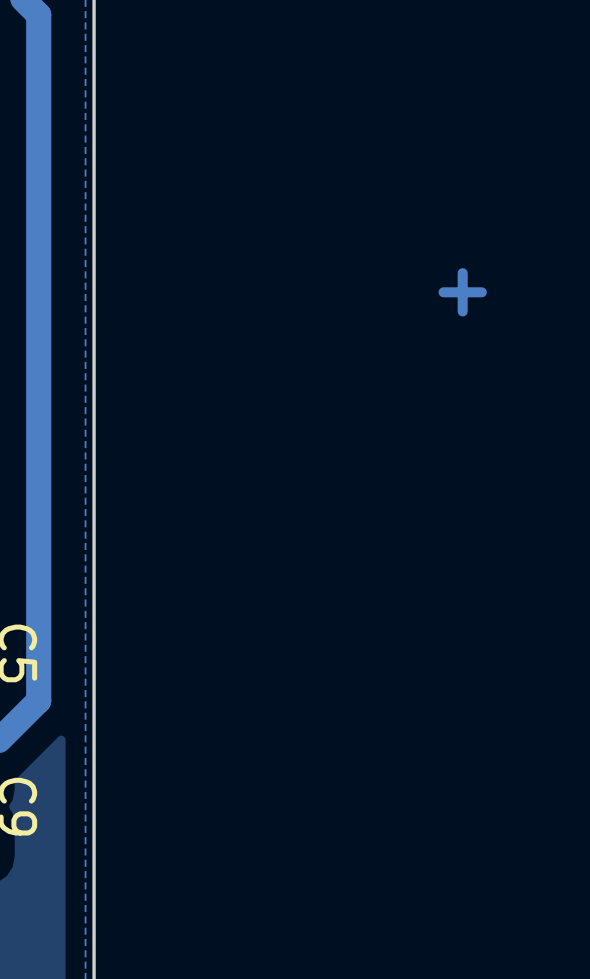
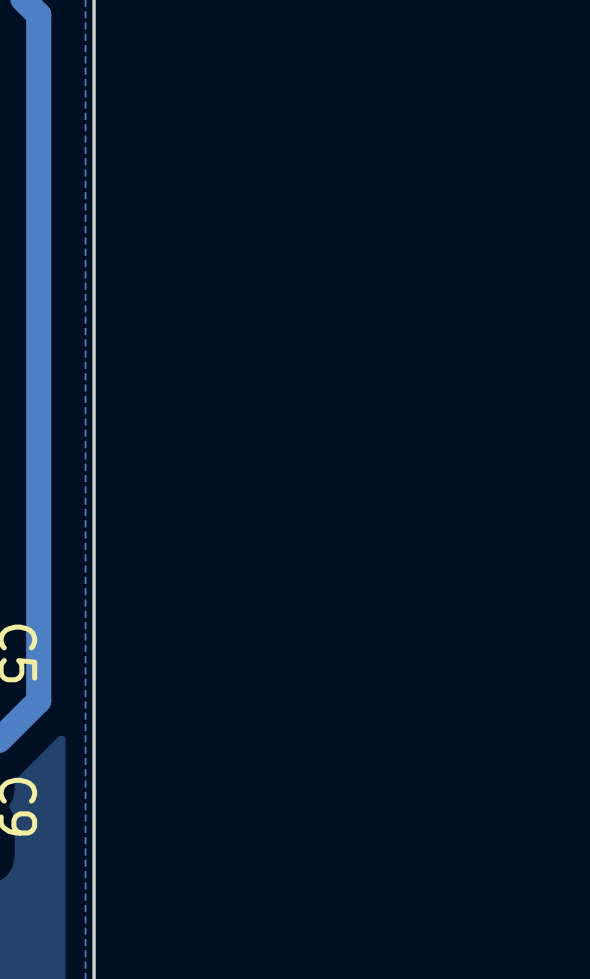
text: + (462, 292) -> none

